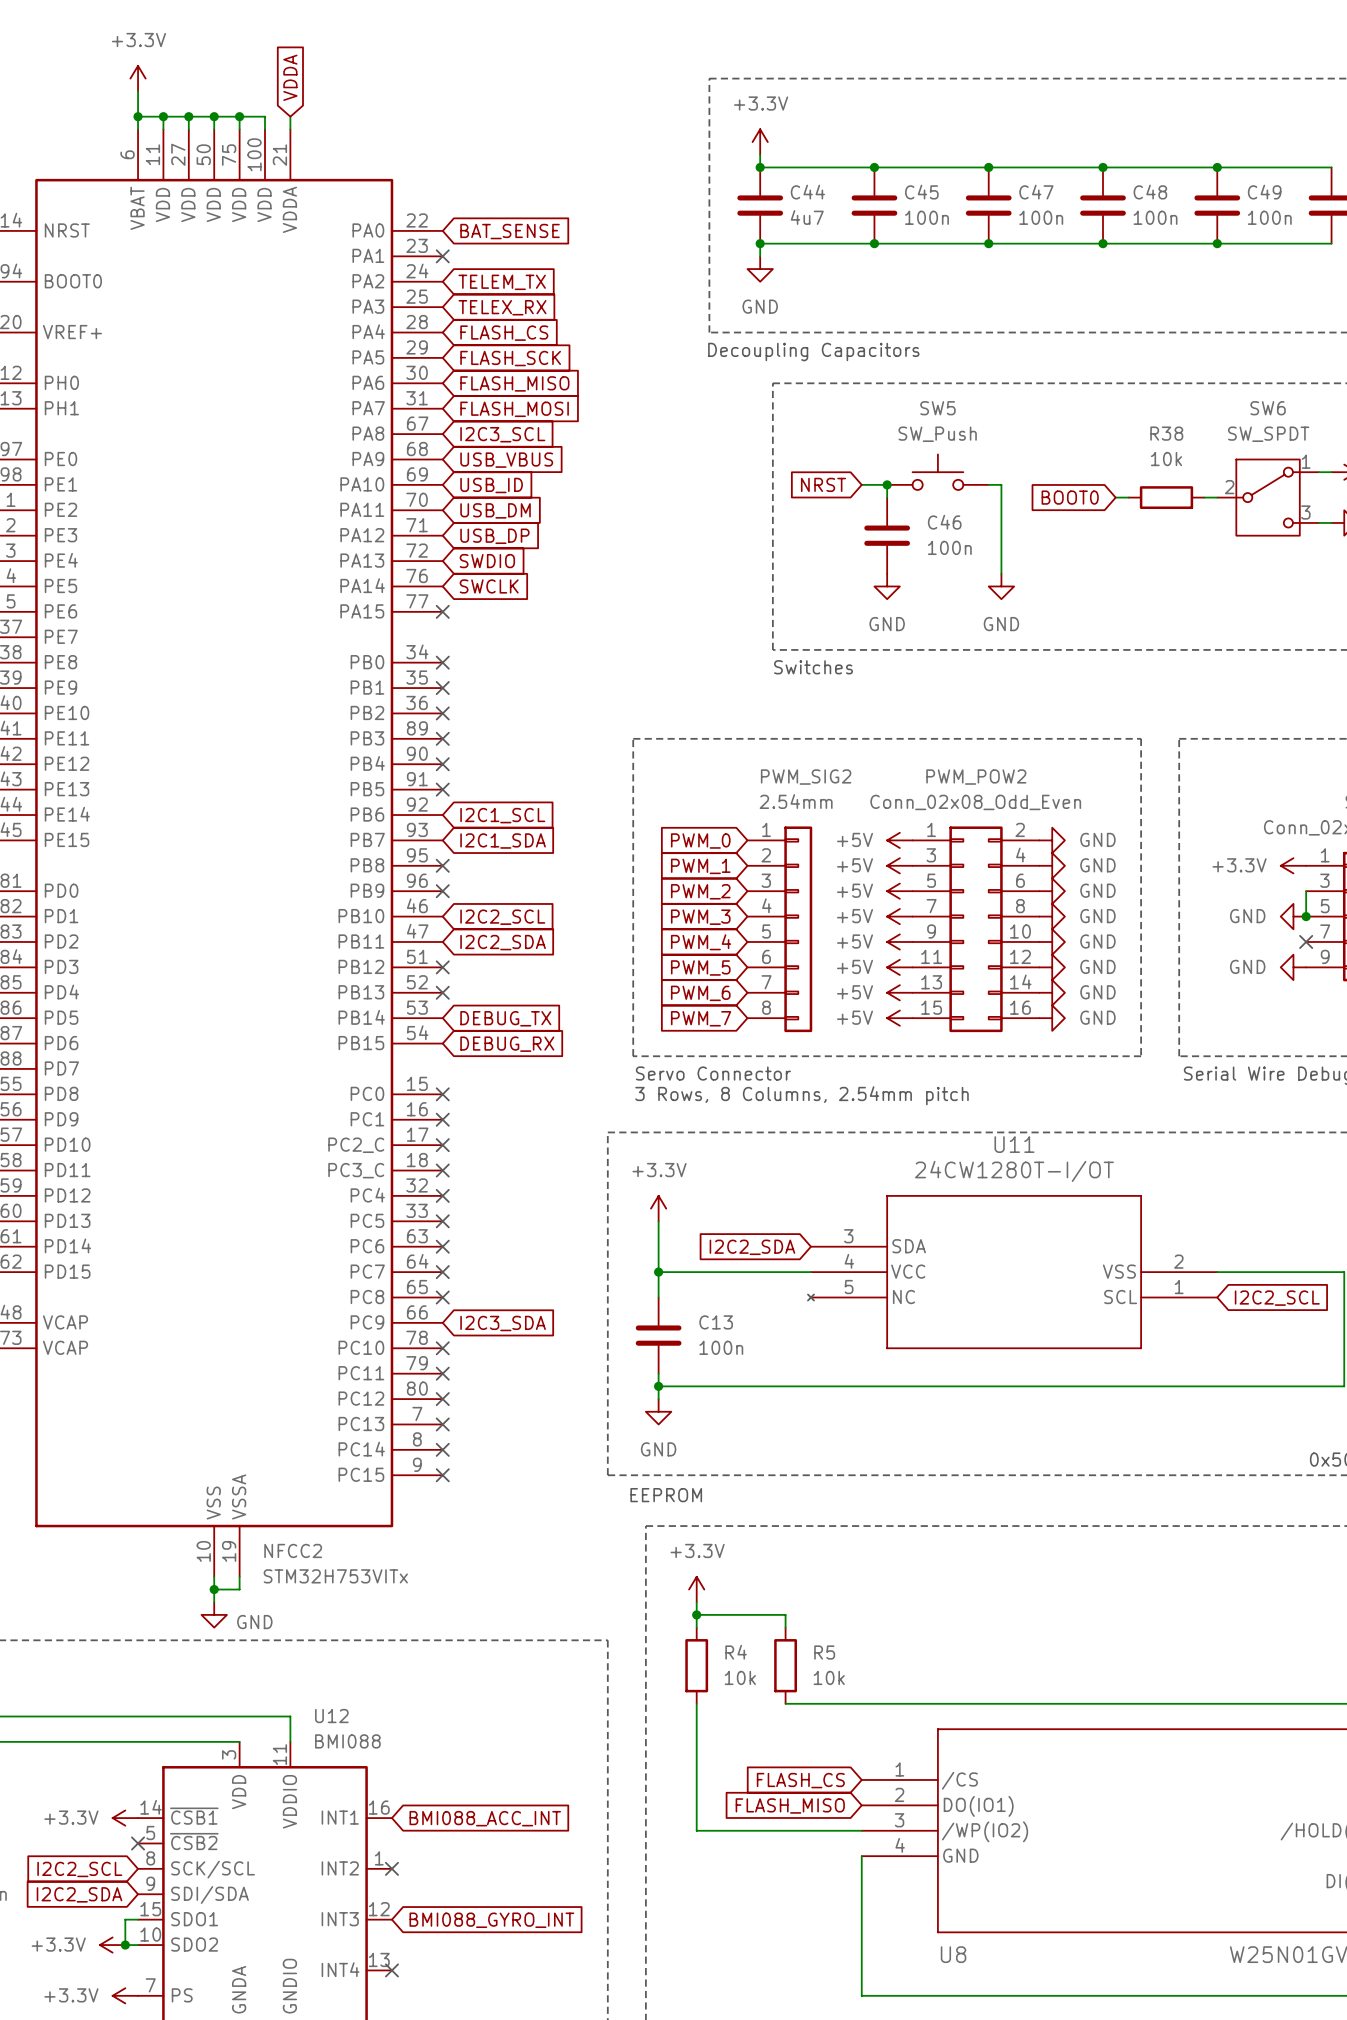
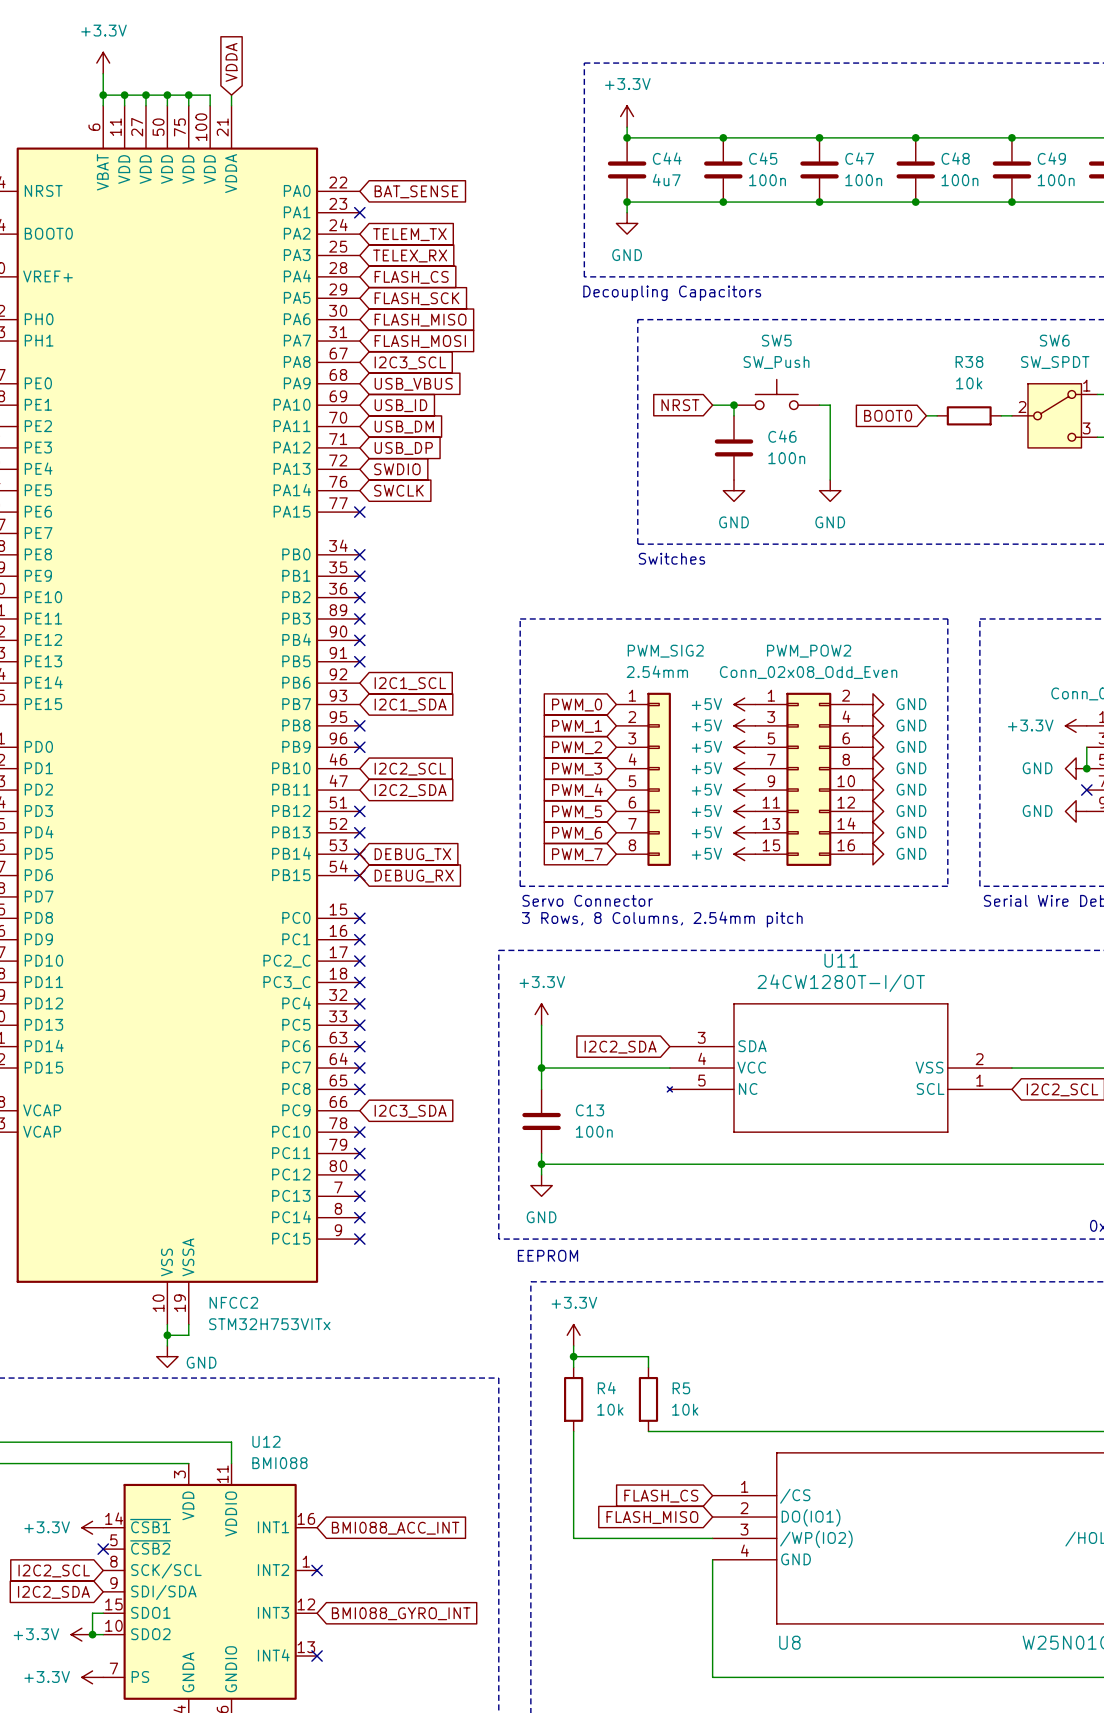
no-connect mark: none -> (359, 854)
no-connect mark: none -> (359, 875)

